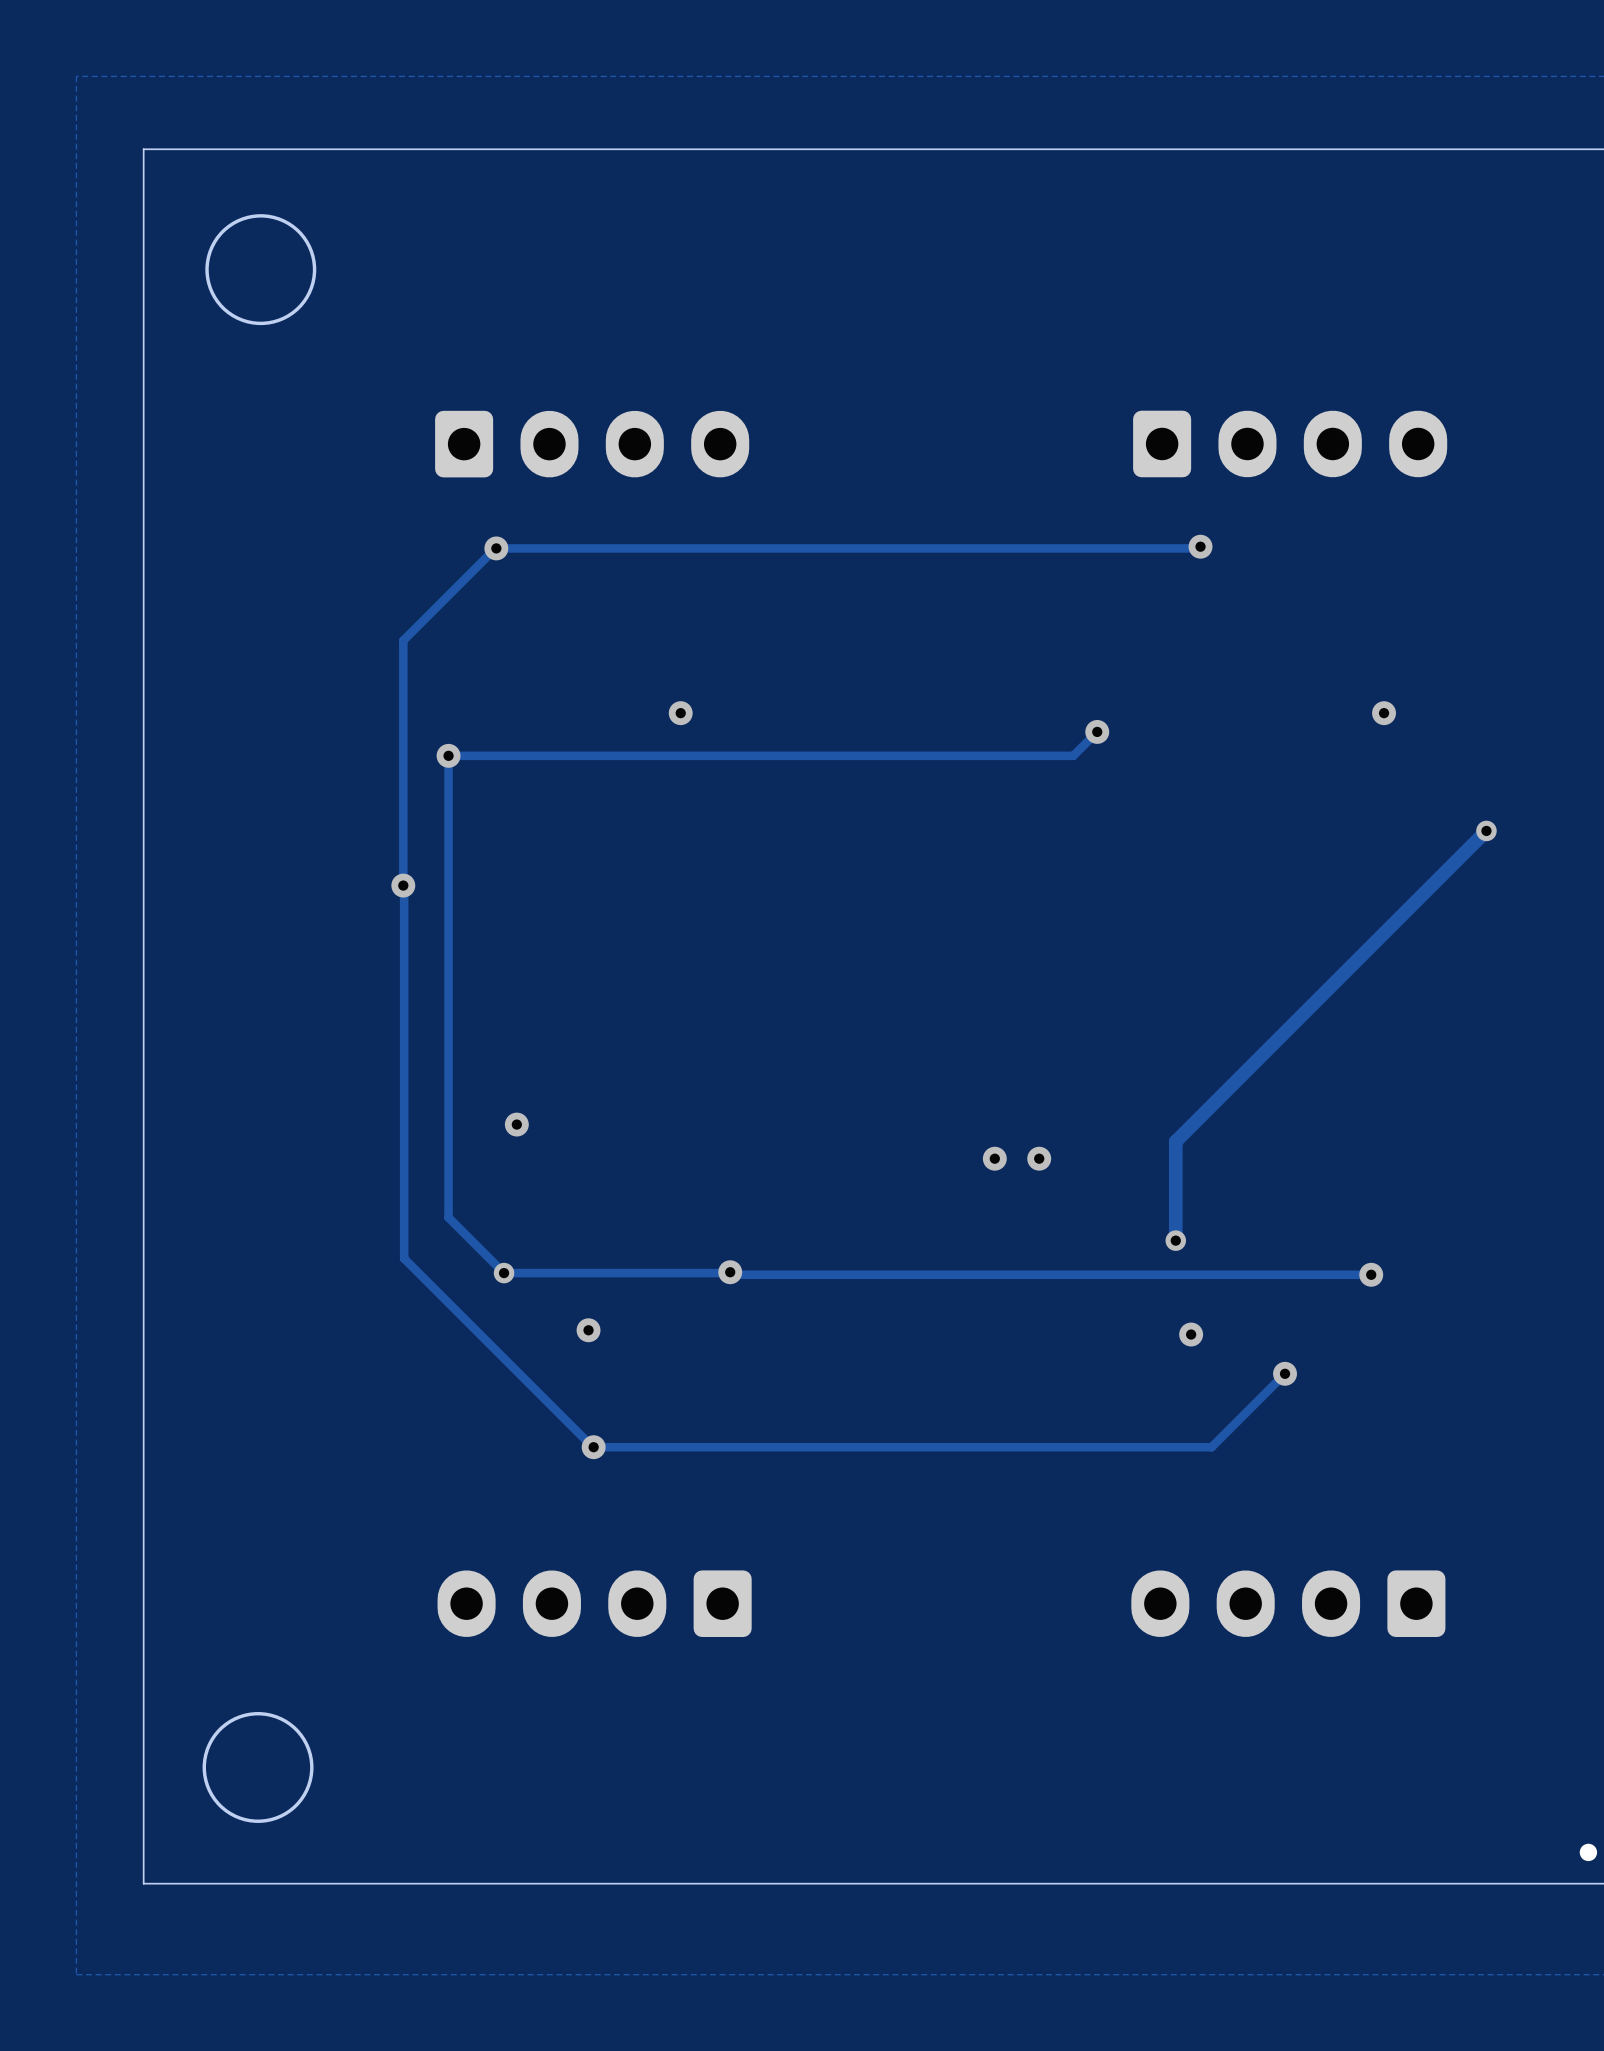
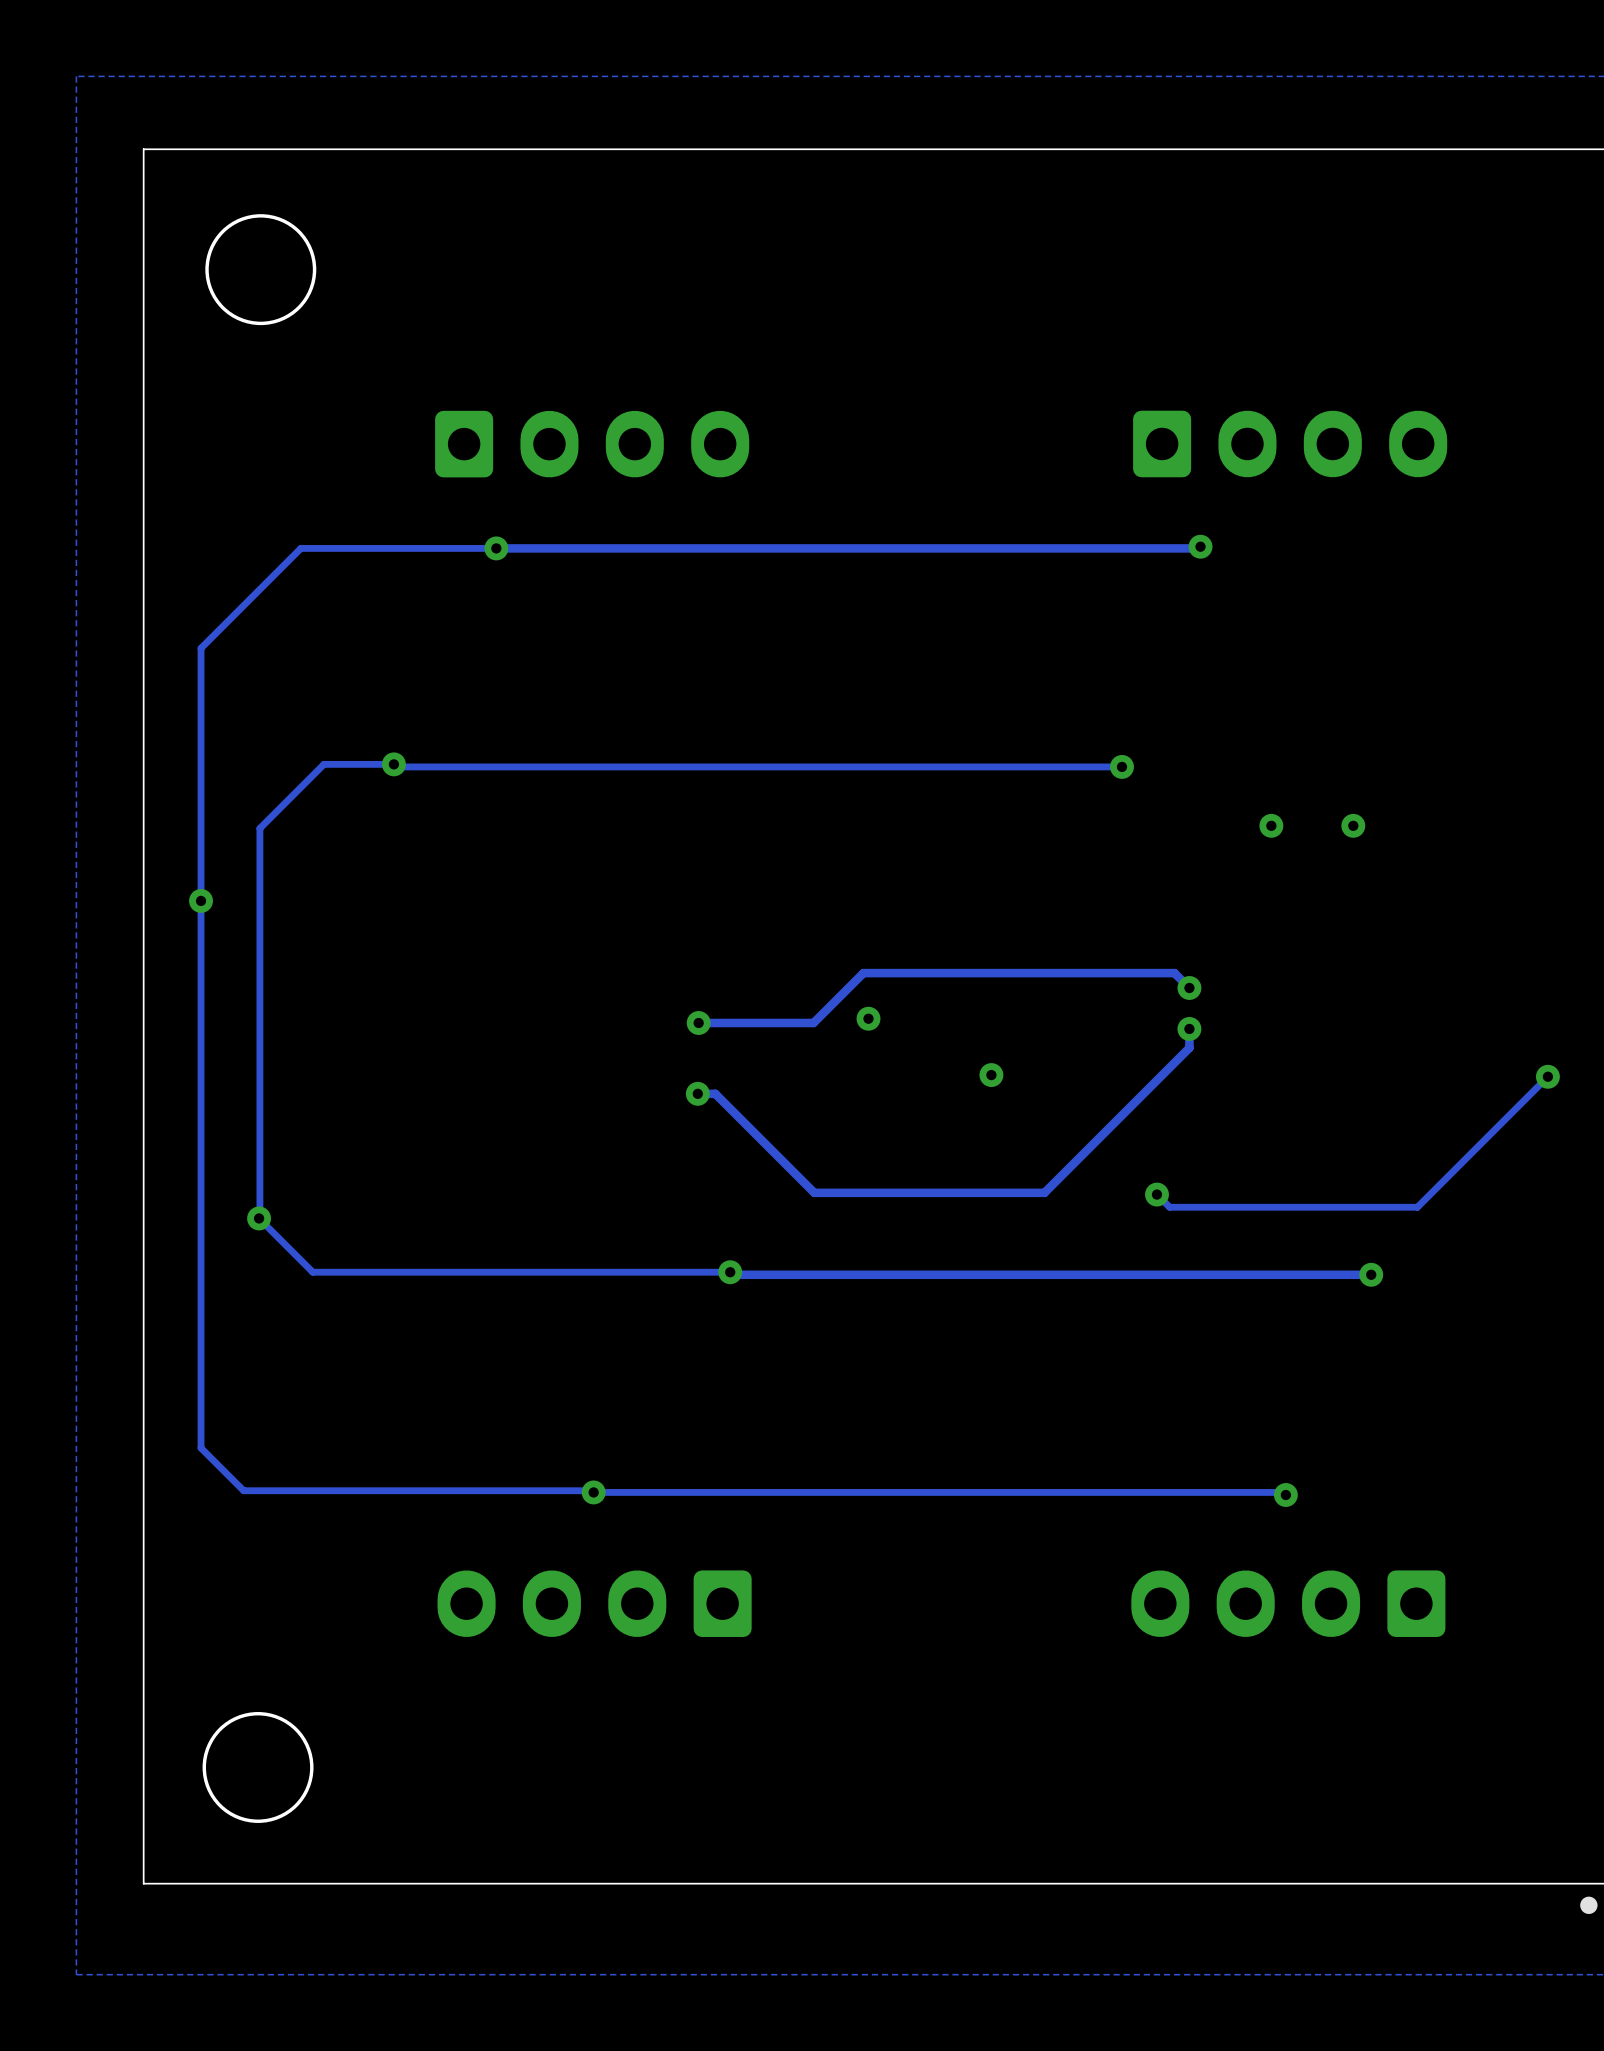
track: (495, 548) (403, 640) (404, 1258) (592, 1447) (1211, 1447) (1285, 1373) -> (495, 548) (300, 548) (201, 648) (201, 1448) (243, 1490) (1283, 1492) (1285, 1495)
via: (680, 713) -> none
via: (1384, 713) -> none
track: (1097, 731) (1073, 755) (448, 755) (448, 1217) (504, 1273) (730, 1272) -> (1122, 766) (396, 766) (393, 764) (323, 764) (259, 828) (259, 1218) (312, 1272) (730, 1272)
via position: (1097, 731) -> (1122, 766)
via position: (448, 755) -> (393, 764)
via: none -> (1271, 825)
via: none -> (1353, 825)
track: (1486, 830) (1175, 1141) (1175, 1240) -> none
via: (1486, 830) -> none
via: (403, 885) -> none
via: none -> (201, 900)
track: none -> (1189, 987) (1174, 973) (863, 973) (813, 1022) (698, 1022)
via: none -> (1189, 987)
via: none -> (868, 1018)
via: none -> (698, 1022)
track: none -> (1189, 1028) (1189, 1047) (1044, 1192) (814, 1192) (715, 1093) (697, 1093)
via: none -> (1189, 1028)
via: none -> (991, 1075)
track: none -> (1547, 1076) (1417, 1207) (1169, 1207) (1156, 1194)
via: none -> (1547, 1076)
via: none -> (697, 1093)
via: (516, 1124) -> none
via: (994, 1158) -> none
via: (1039, 1158) -> none
via: none -> (1156, 1194)
via: none -> (259, 1218)
via: (1175, 1240) -> none
via: (504, 1273) -> none
via: (588, 1330) -> none
via: (1191, 1334) -> none
via: (1285, 1373) -> none
via position: (593, 1447) -> (593, 1492)
via: none -> (1285, 1495)
part position: (1588, 1852) -> (1588, 1905)

